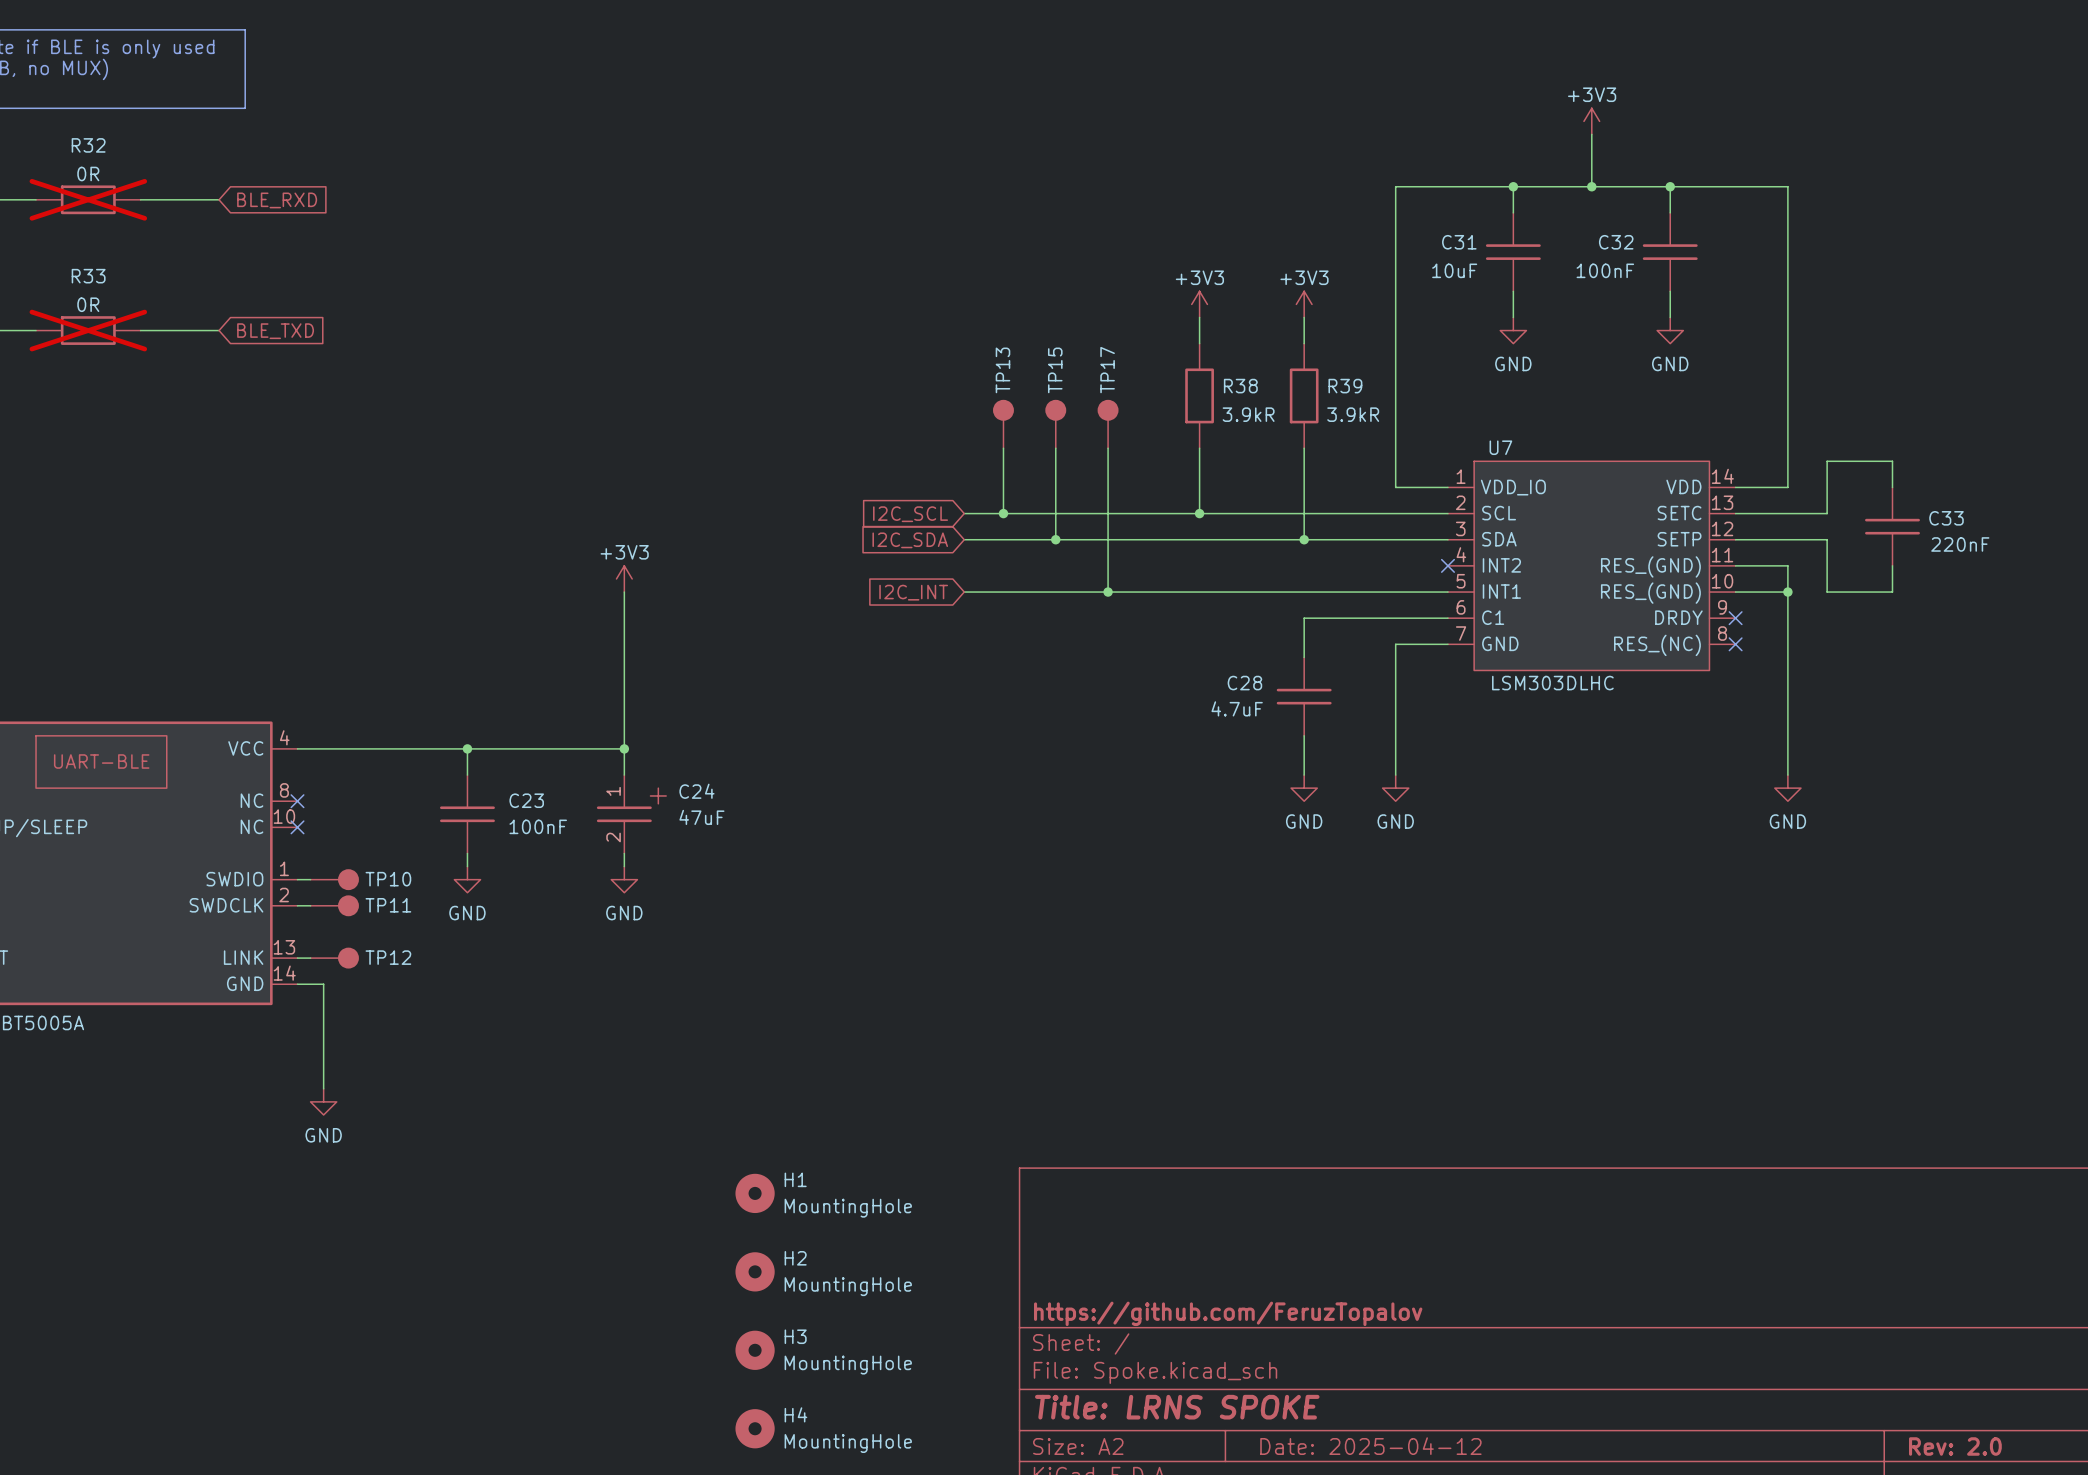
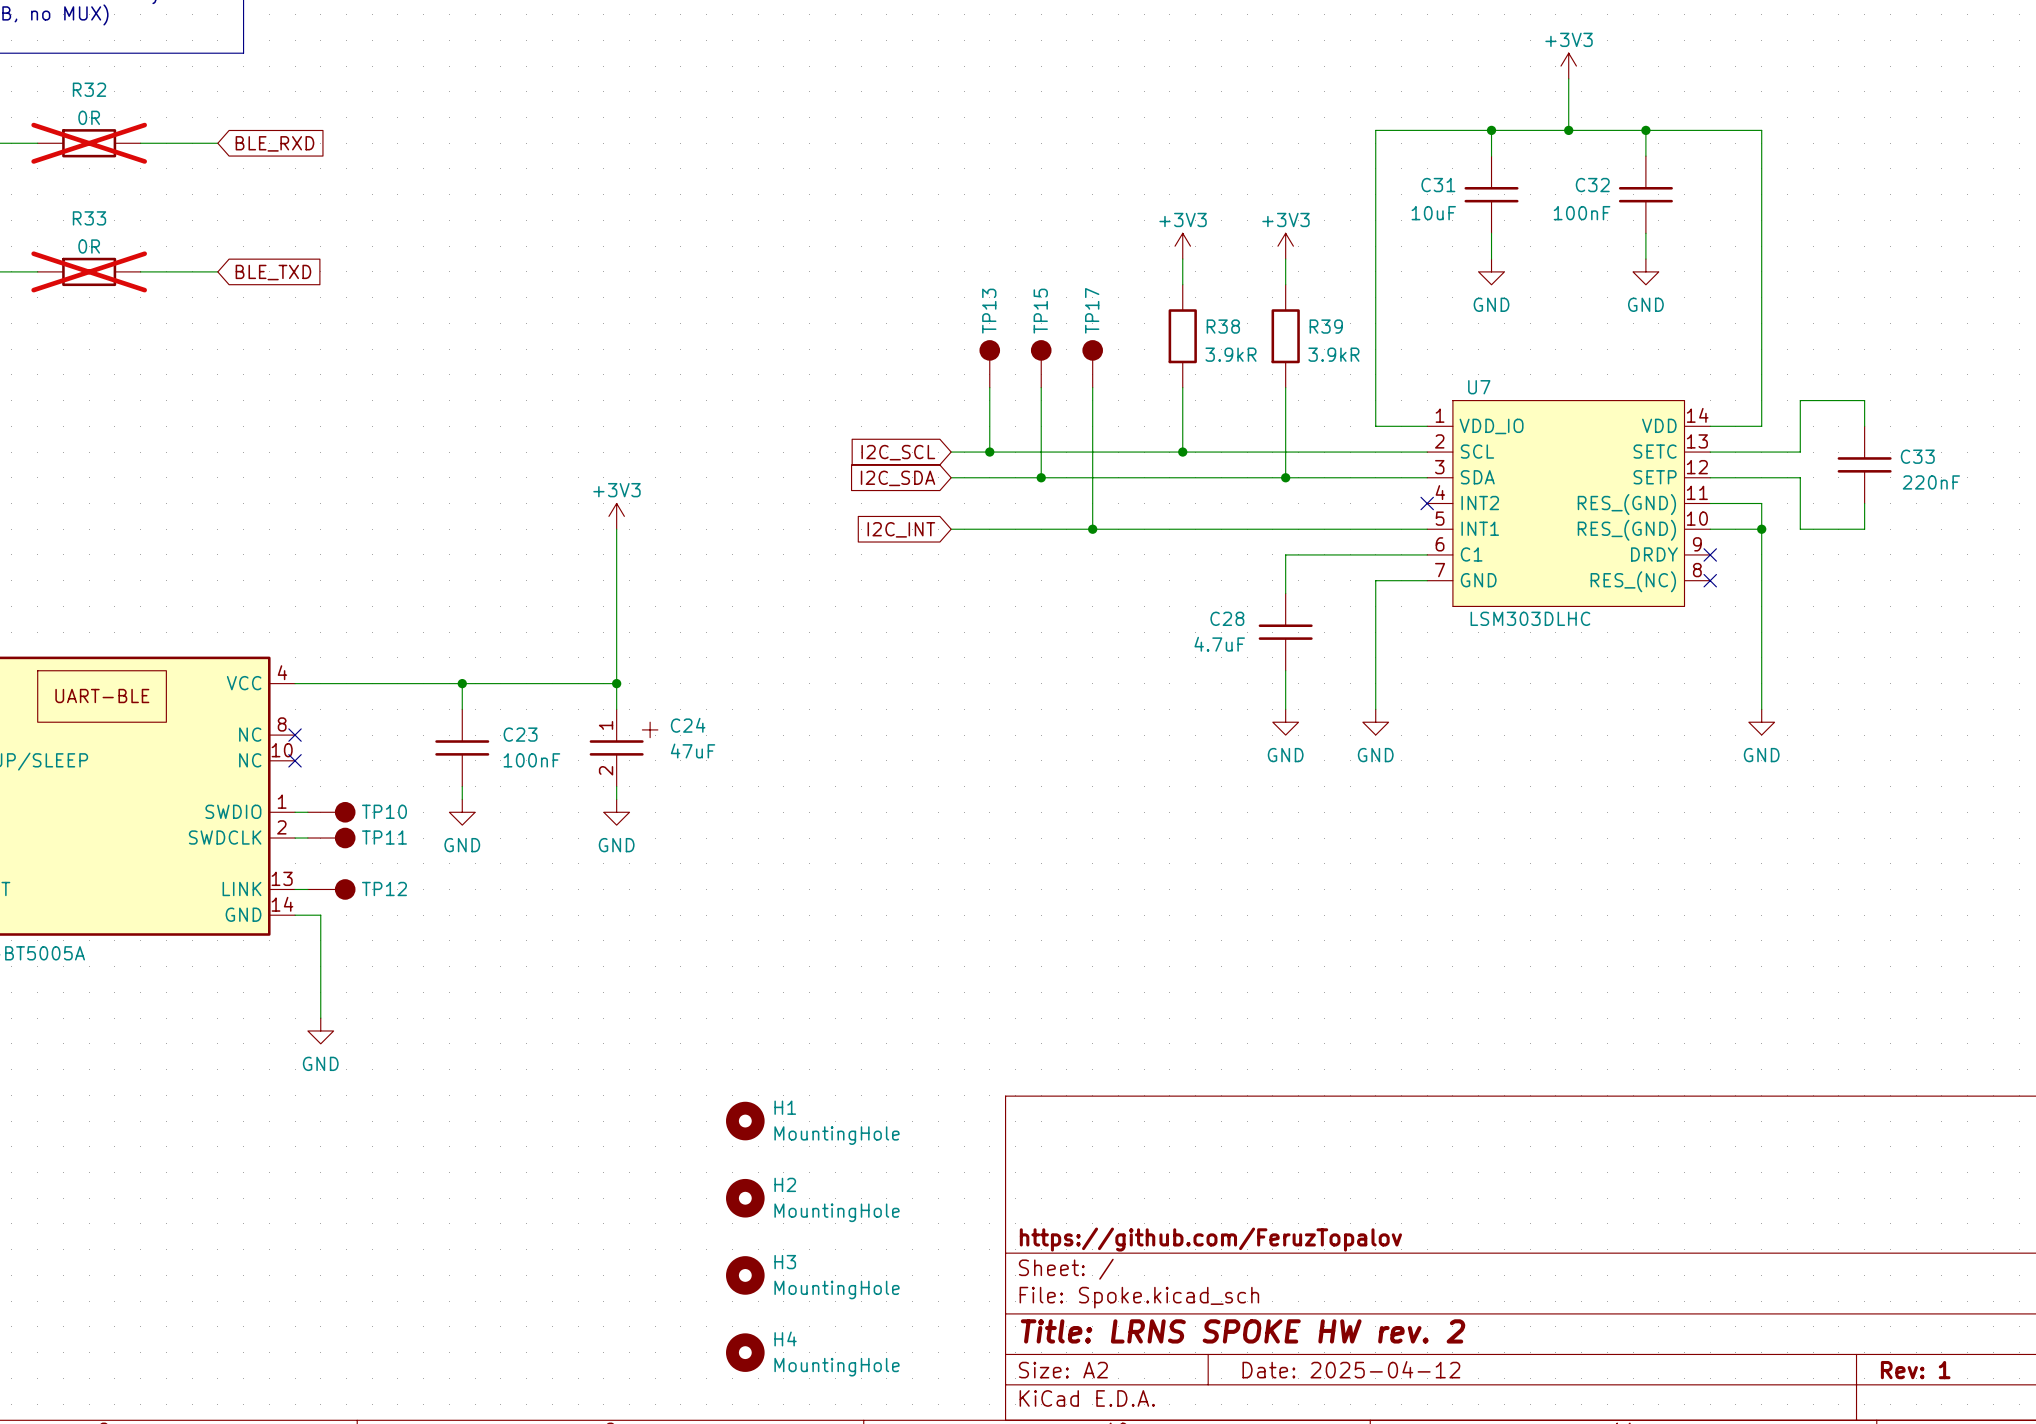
title block: Title: LRNS SPOKE (1177, 1407) -> Title: LRNS SPOKE HW rev. 2 (1243, 1331)
title block: Rev: 2.0 (1955, 1446) -> Rev: 1 (1915, 1370)

